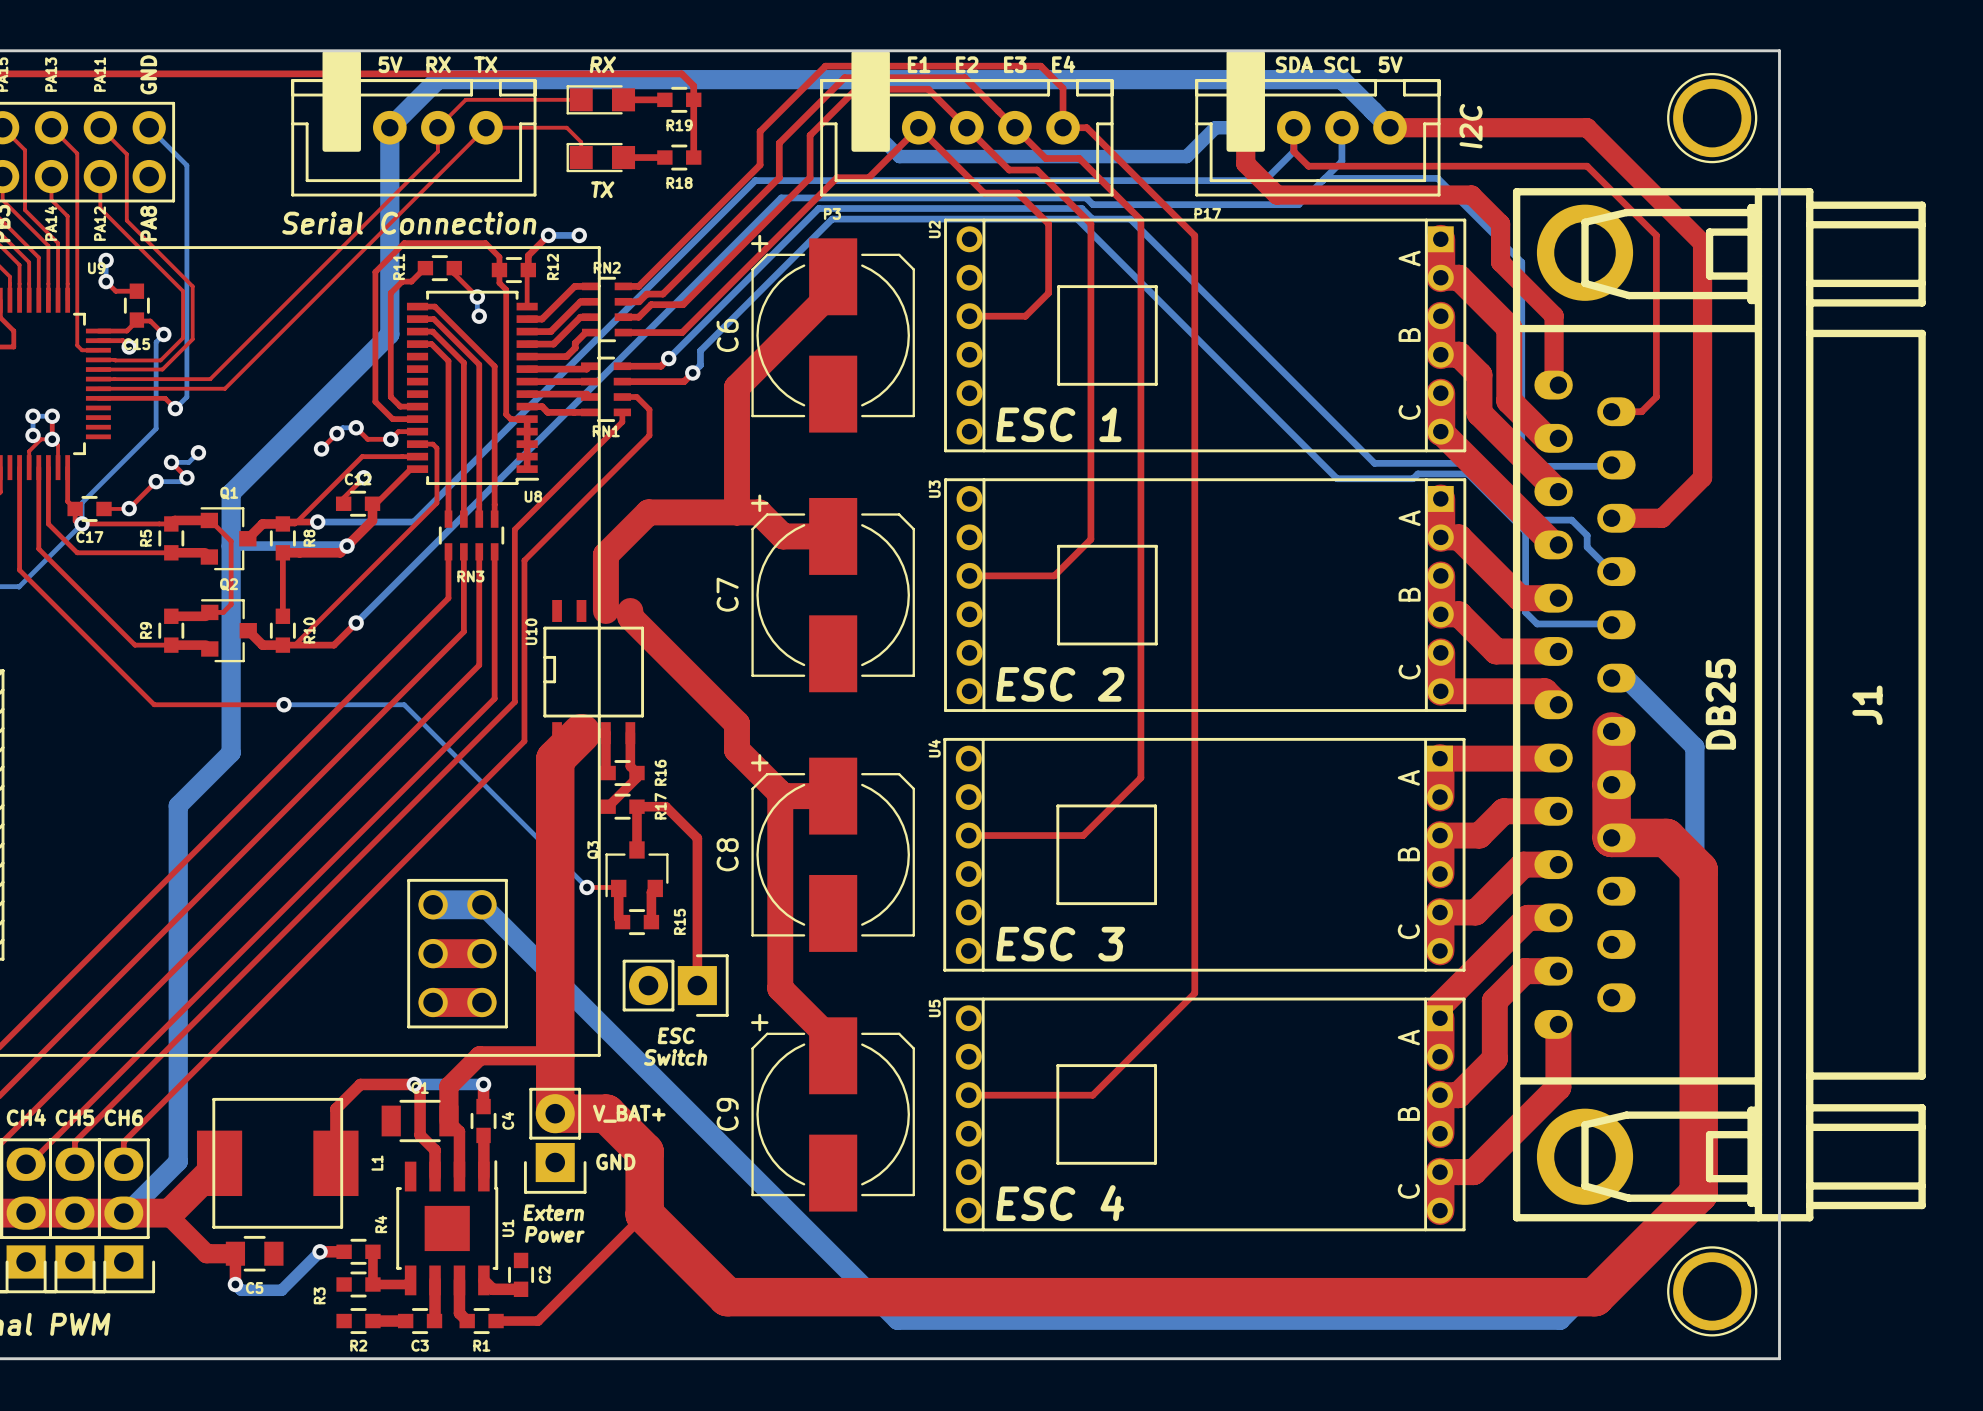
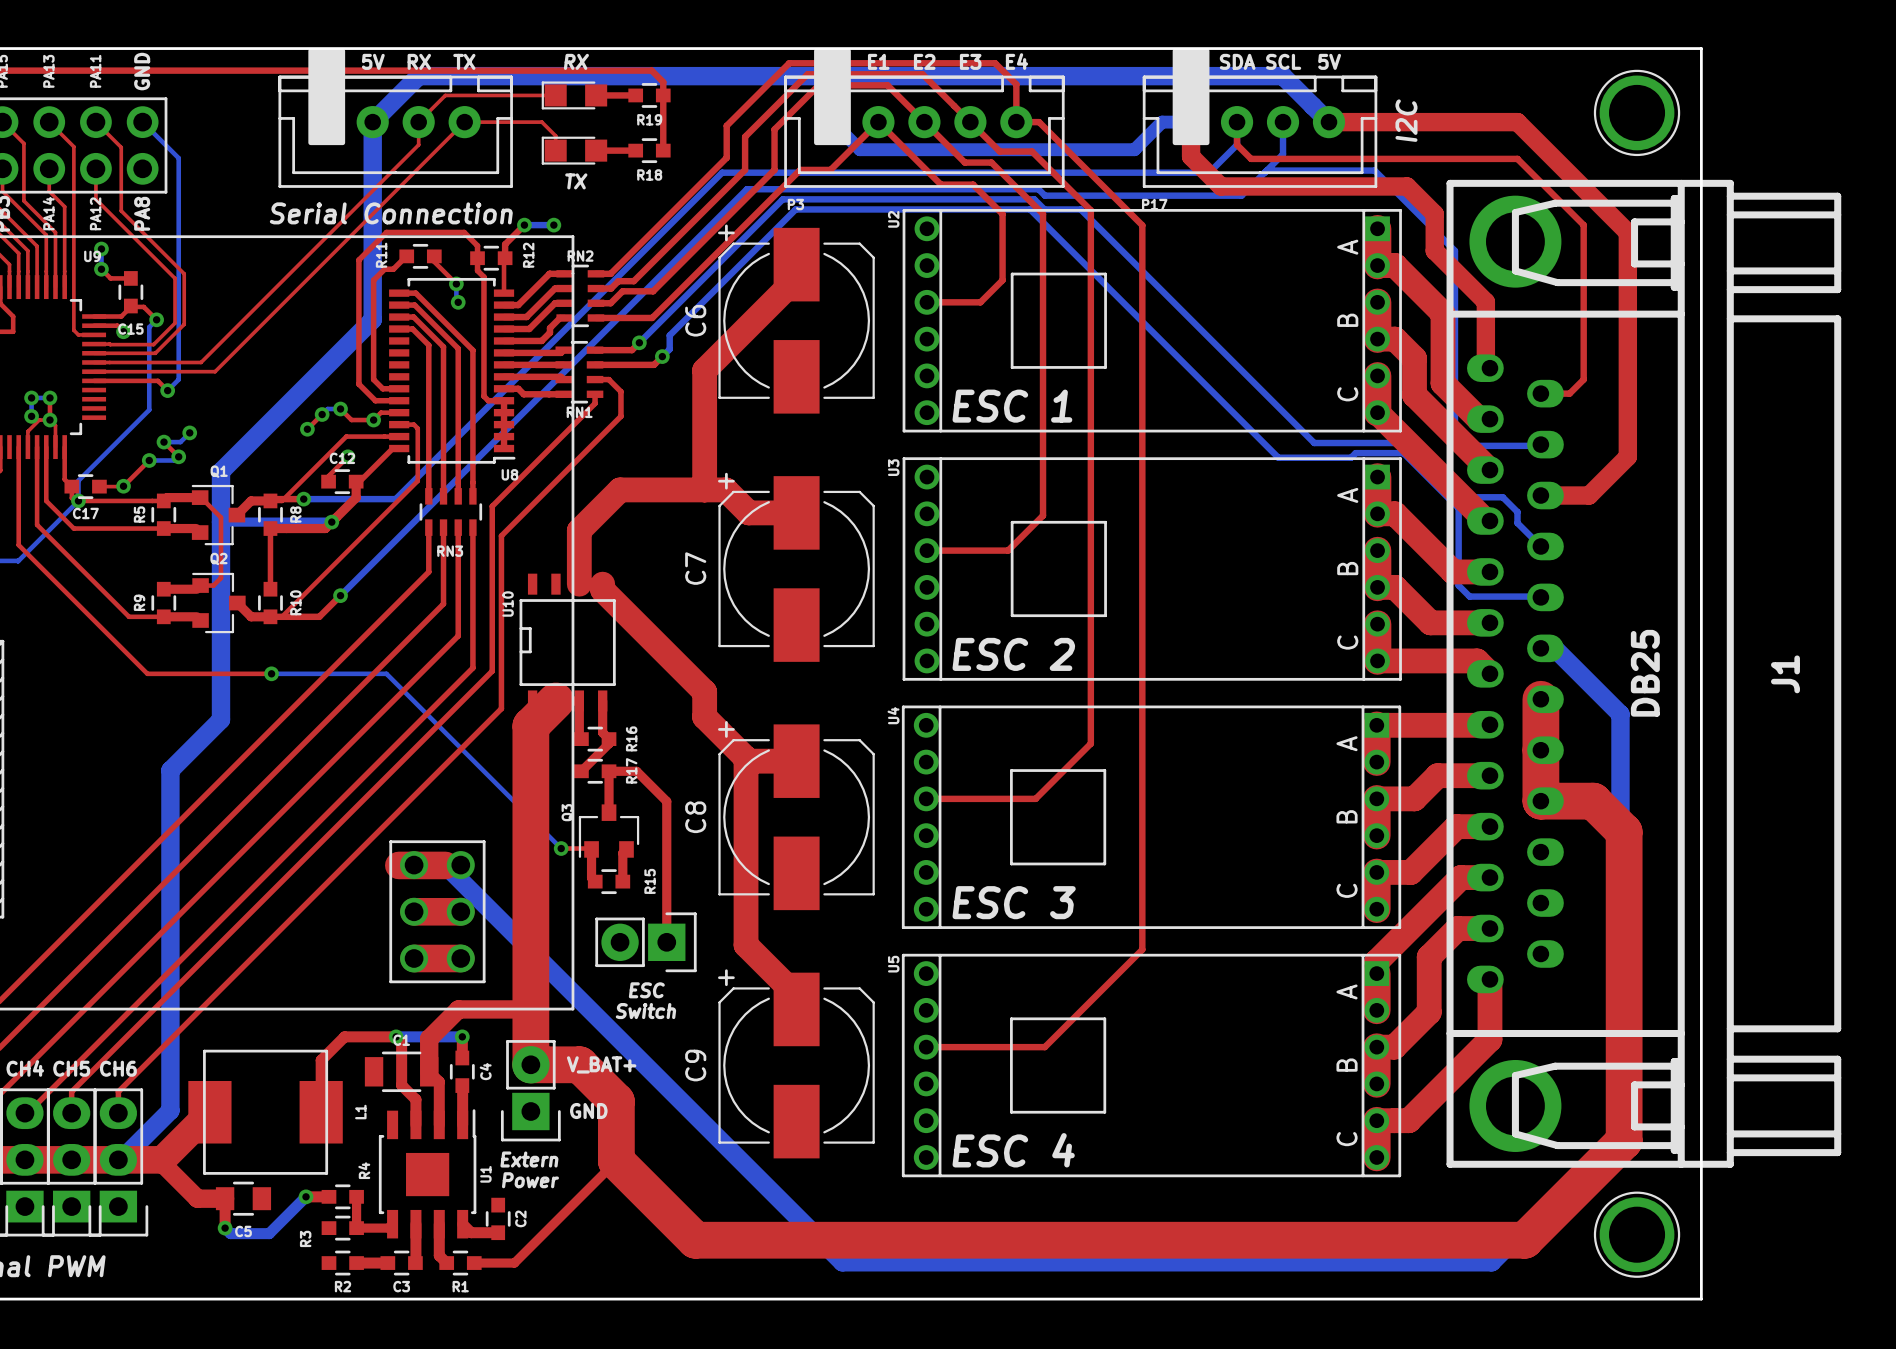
bottom track: (433, 904) (481, 904) (897, 1320) -> (445, 865) (842, 1262) (858, 1262)
top track: none -> (398, 865) (445, 865)

